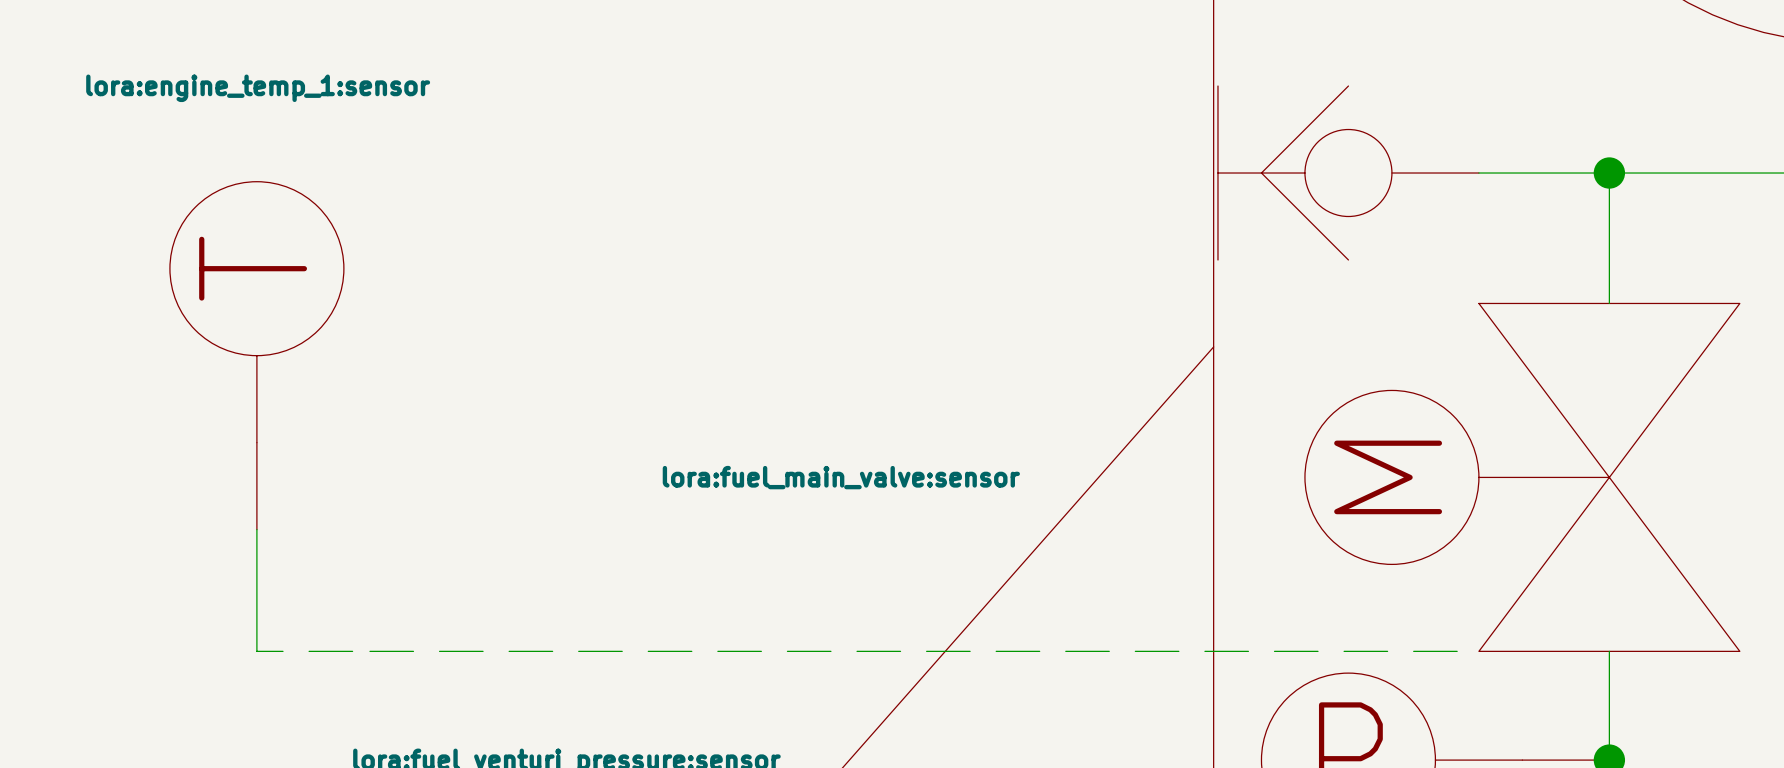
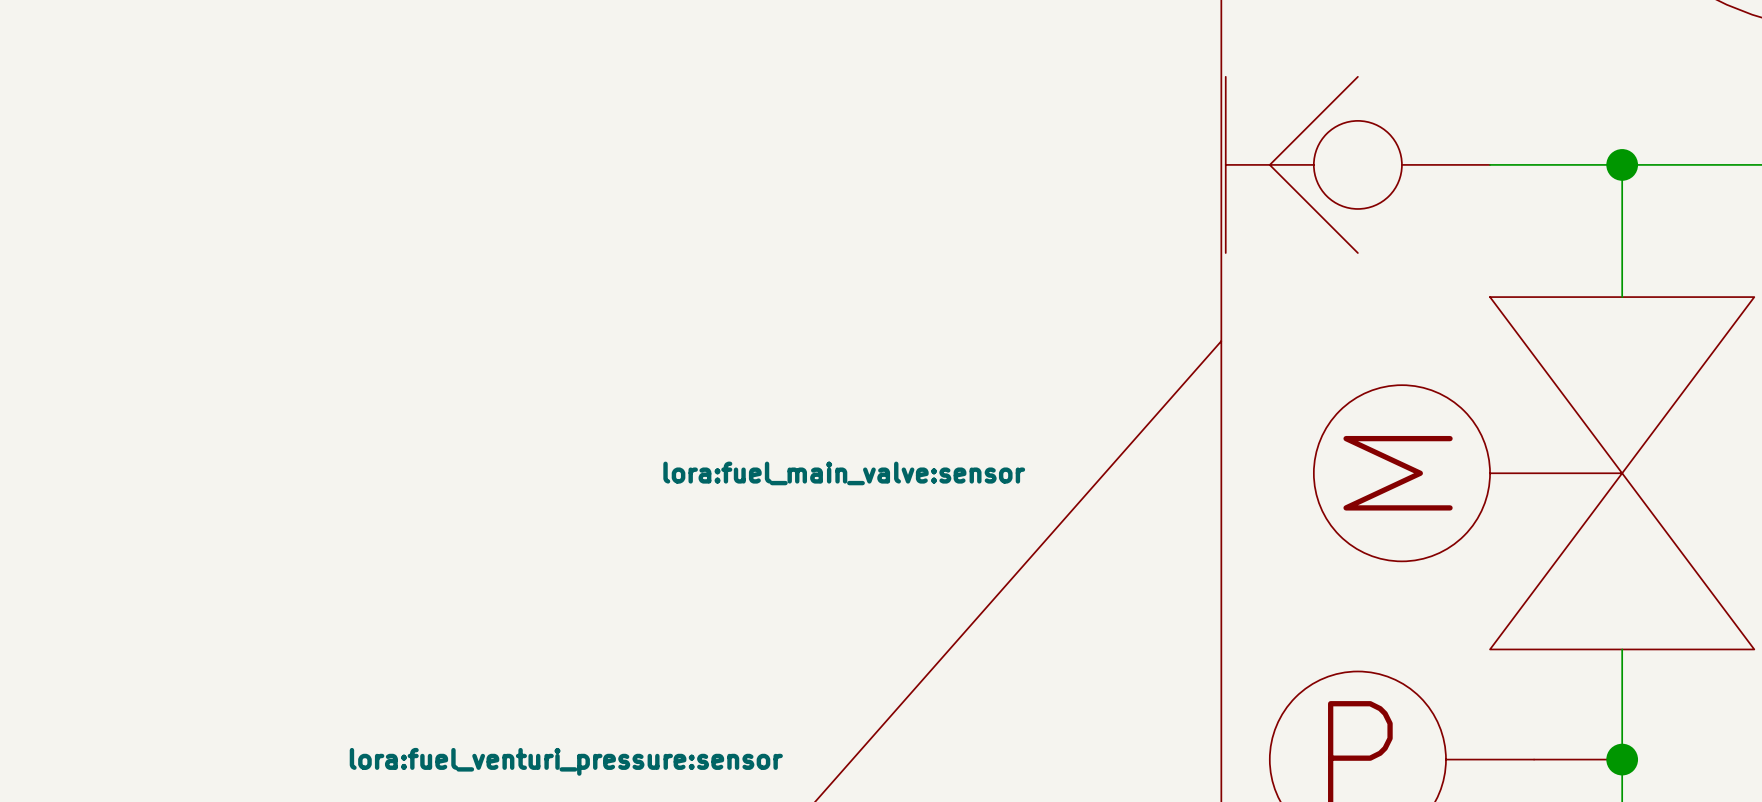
part: lora:engine_temp_1:sensor (256, 355) -> none
wire: (256, 529) (256, 651) (283, 651) -> none
wire: (309, 651) (352, 651) -> none
wire: (369, 651) (413, 651) -> none
wire: (439, 651) (483, 651) -> none
wire: (509, 651) (552, 651) -> none
wire: (578, 651) (622, 651) -> none
wire: (648, 651) (691, 651) -> none
wire: (717, 651) (761, 651) -> none
wire: (787, 651) (830, 651) -> none
wire: (857, 651) (900, 651) -> none
wire: (926, 651) (970, 651) -> none
wire: (996, 651) (1039, 651) -> none
wire: (1065, 651) (1109, 651) -> none
wire: (1135, 651) (1178, 651) -> none
wire: (1204, 651) (1248, 651) -> none
wire: (1274, 651) (1318, 651) -> none
wire: (1344, 651) (1387, 651) -> none
wire: (1413, 651) (1457, 651) -> none

